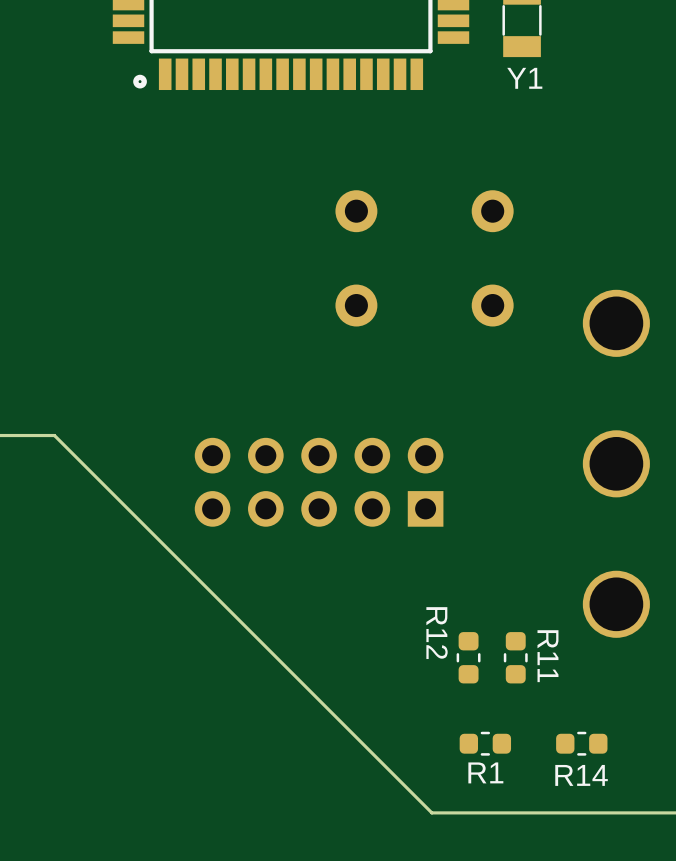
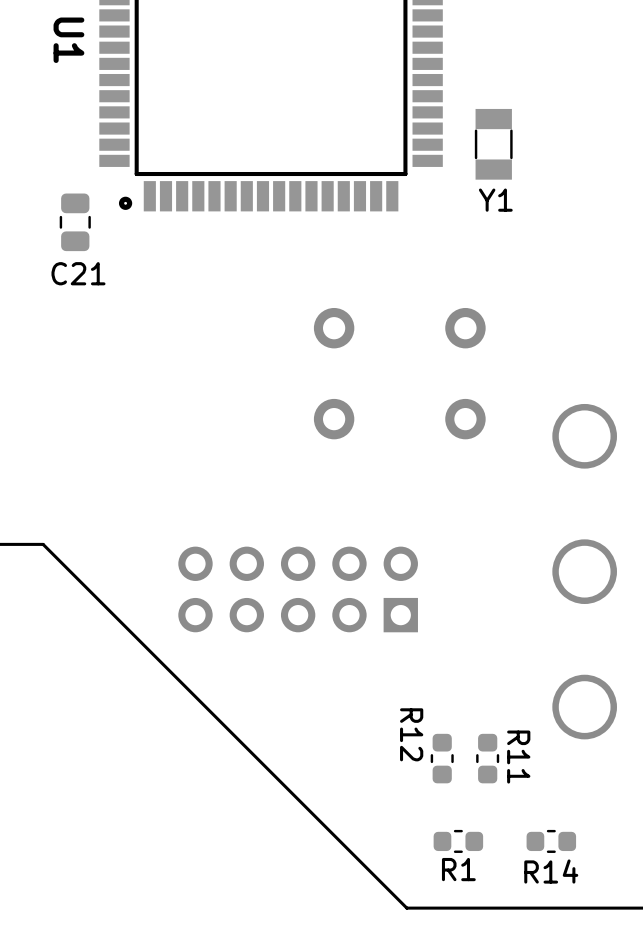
C21: none -> (75, 222)

